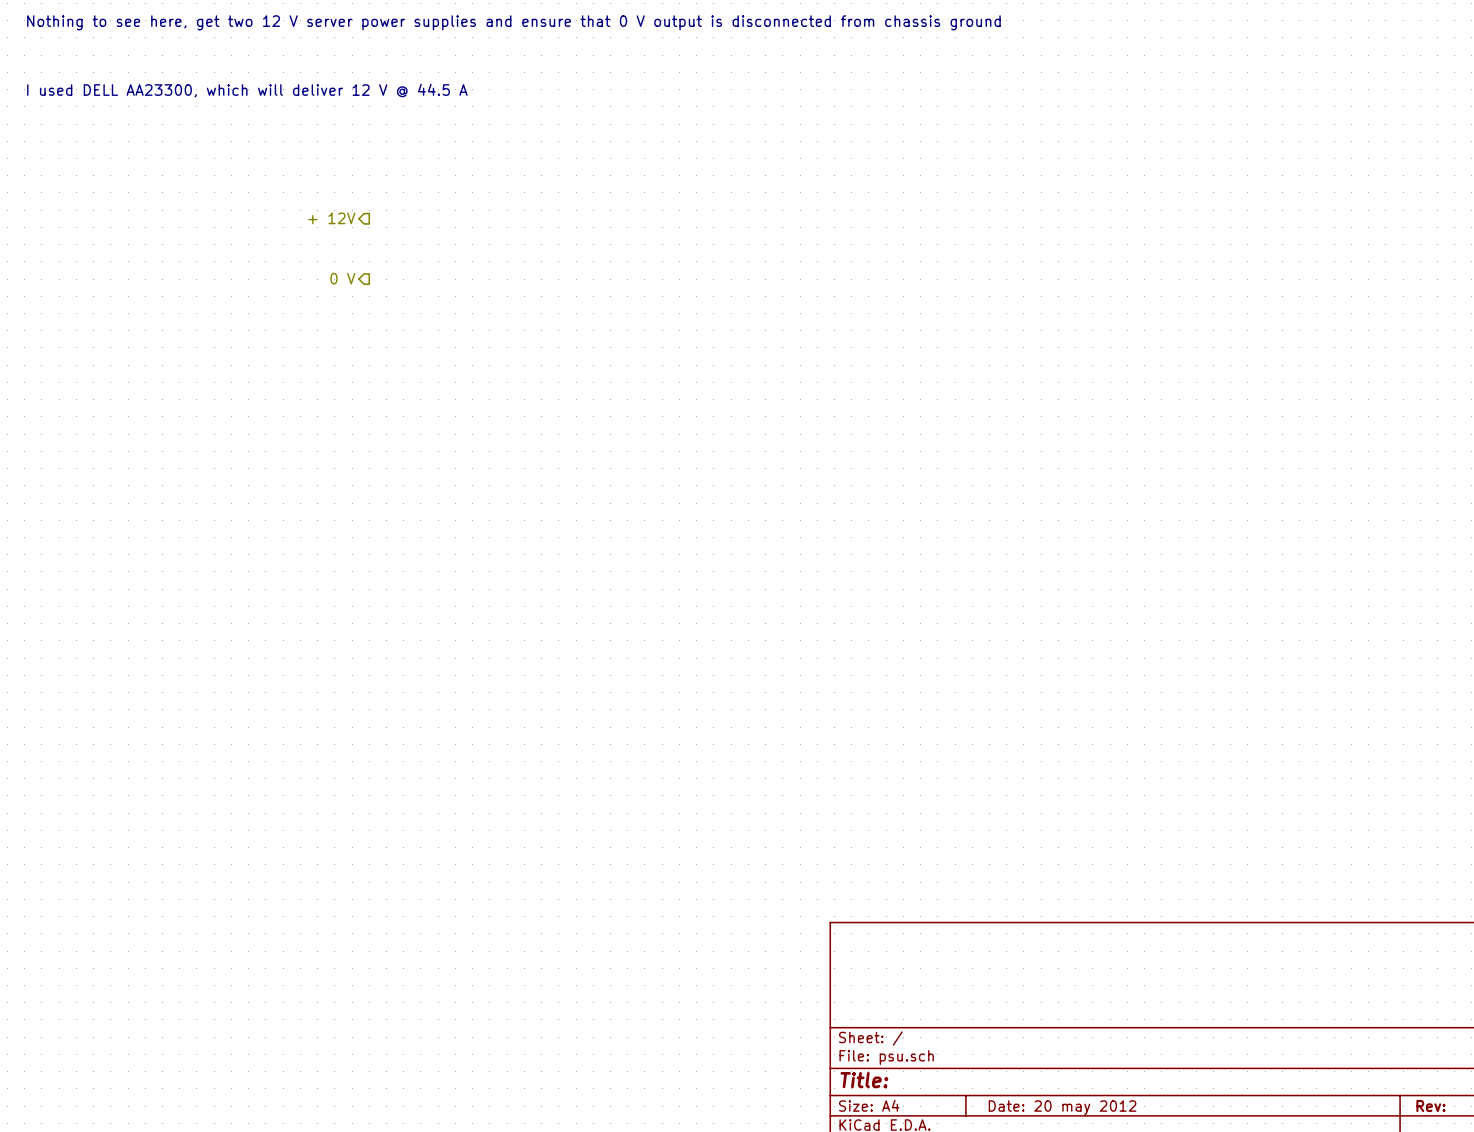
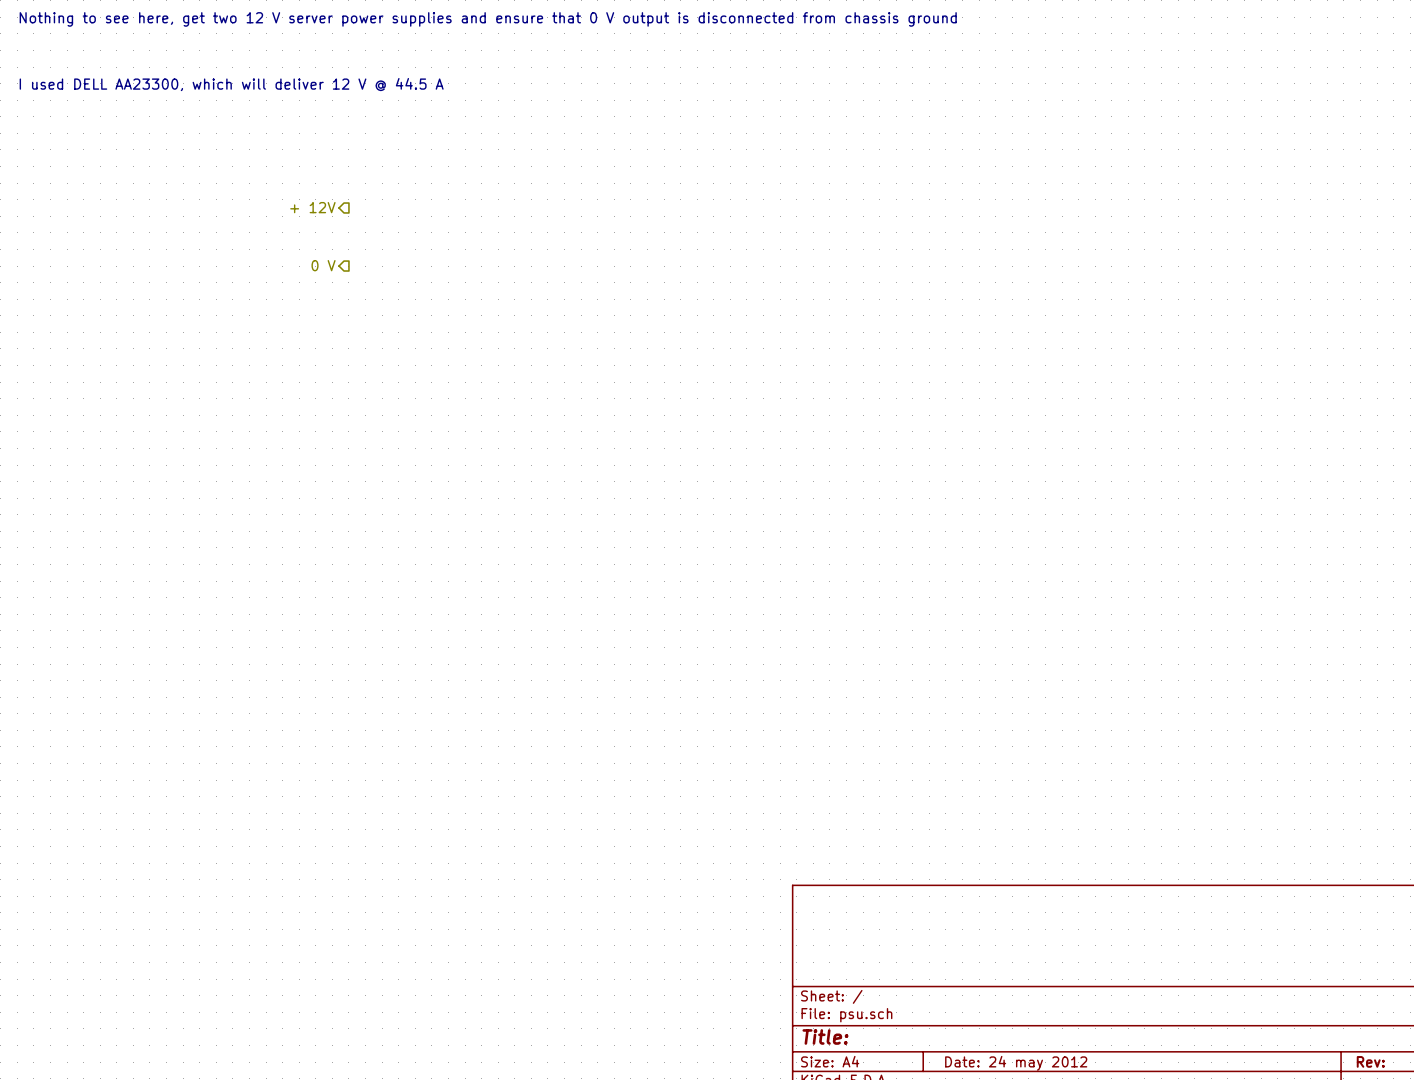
title block: Date: 20 may 2012 (1062, 1107) -> Date: 24 may 2012 (1016, 1063)

